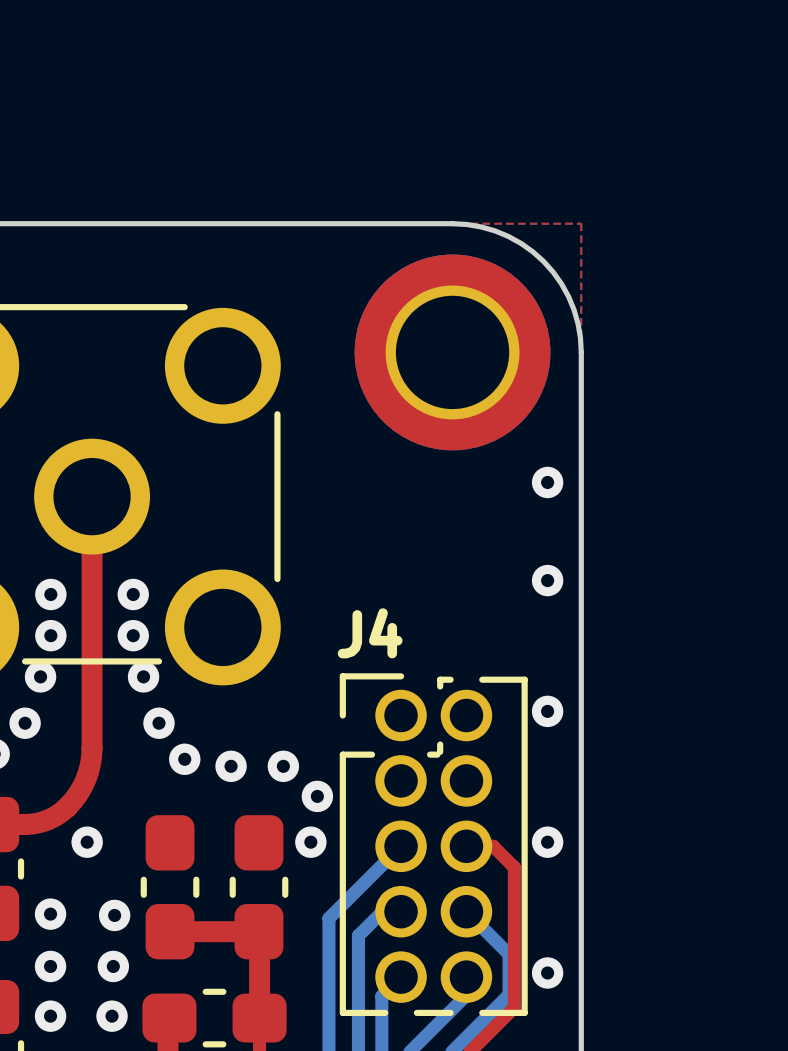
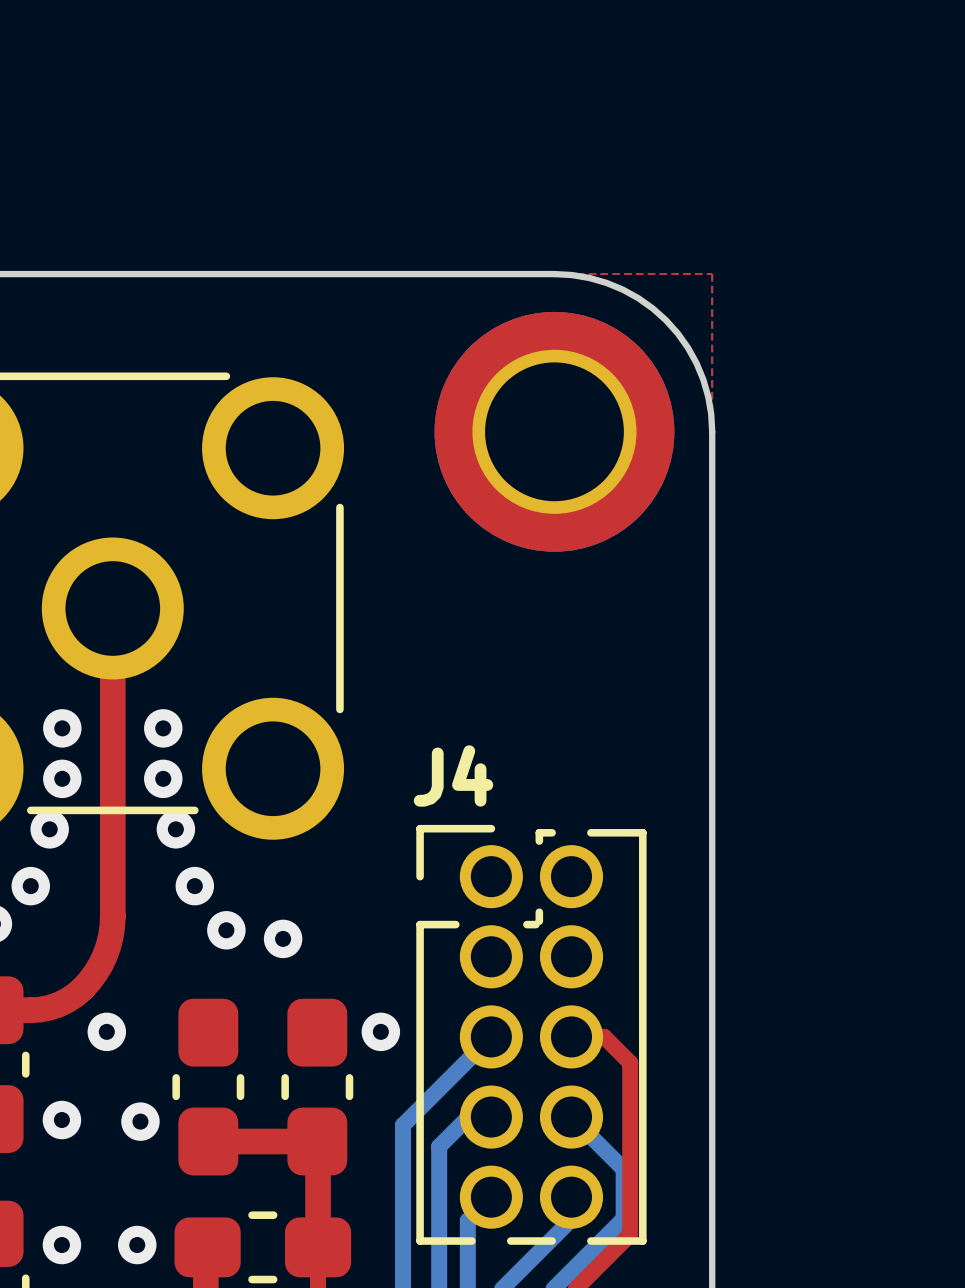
via: (547, 482) -> none
via: (547, 580) -> none
via: (547, 711) -> none
via: (283, 766) -> none
via: (317, 796) -> none
via: (547, 842) -> none
via: (50, 966) -> none
via: (113, 966) -> none
via: (547, 973) -> none

